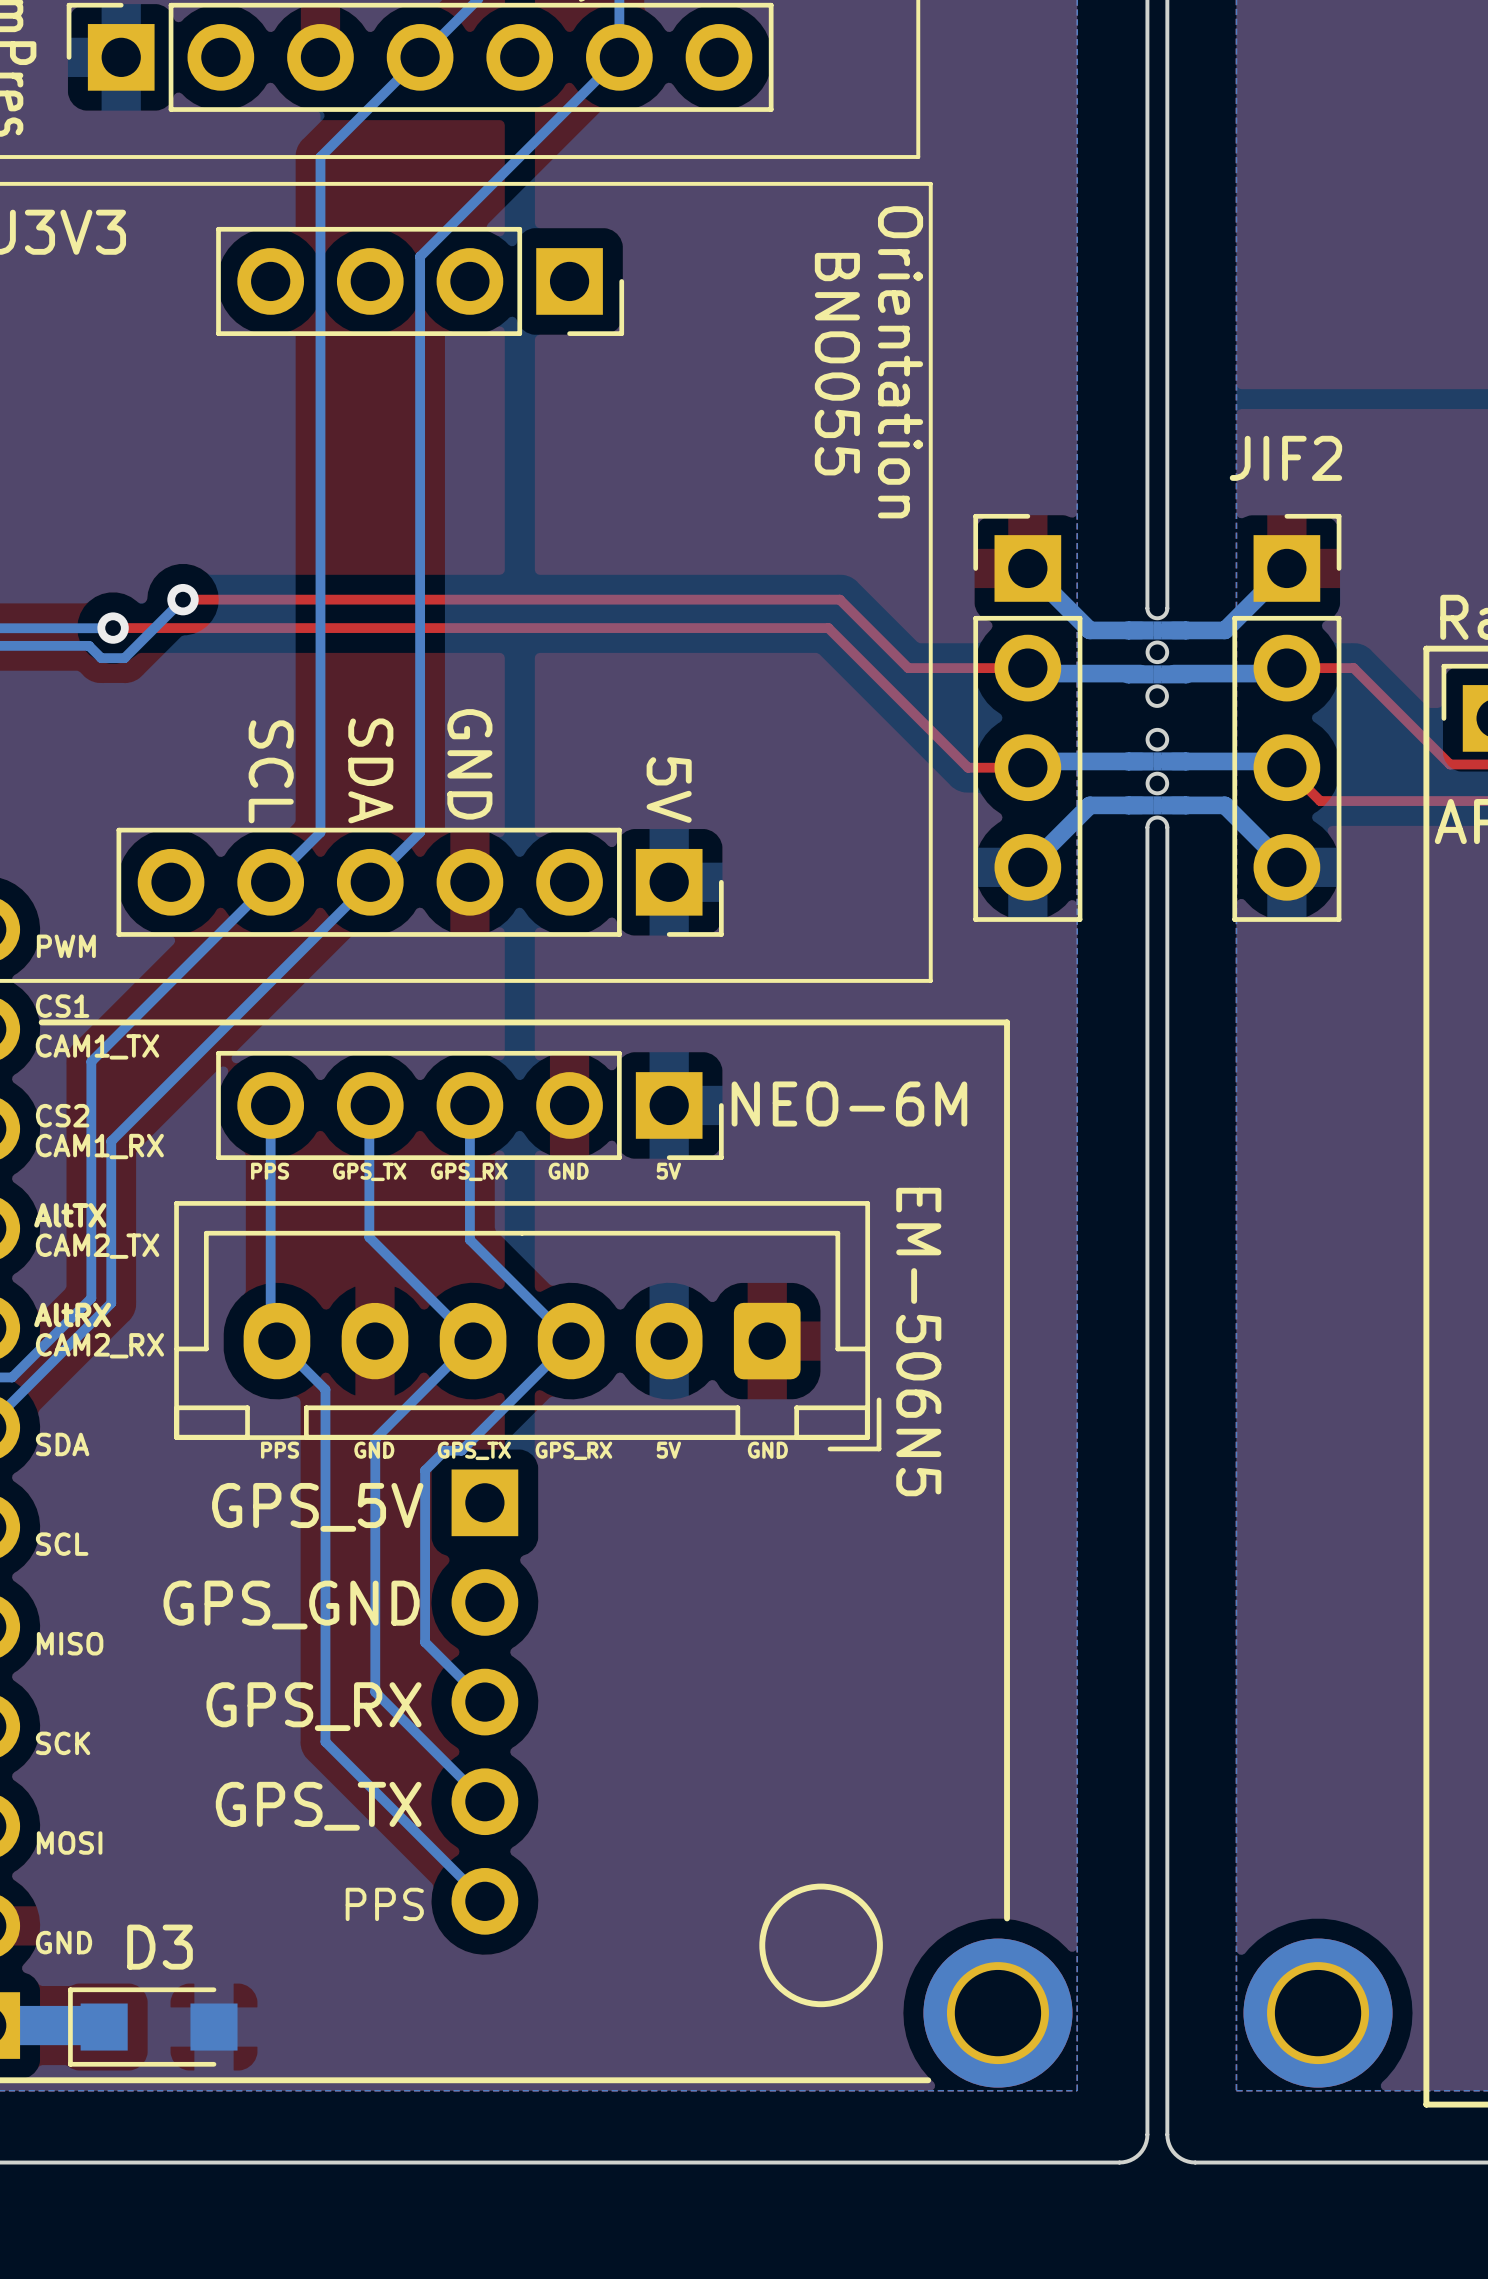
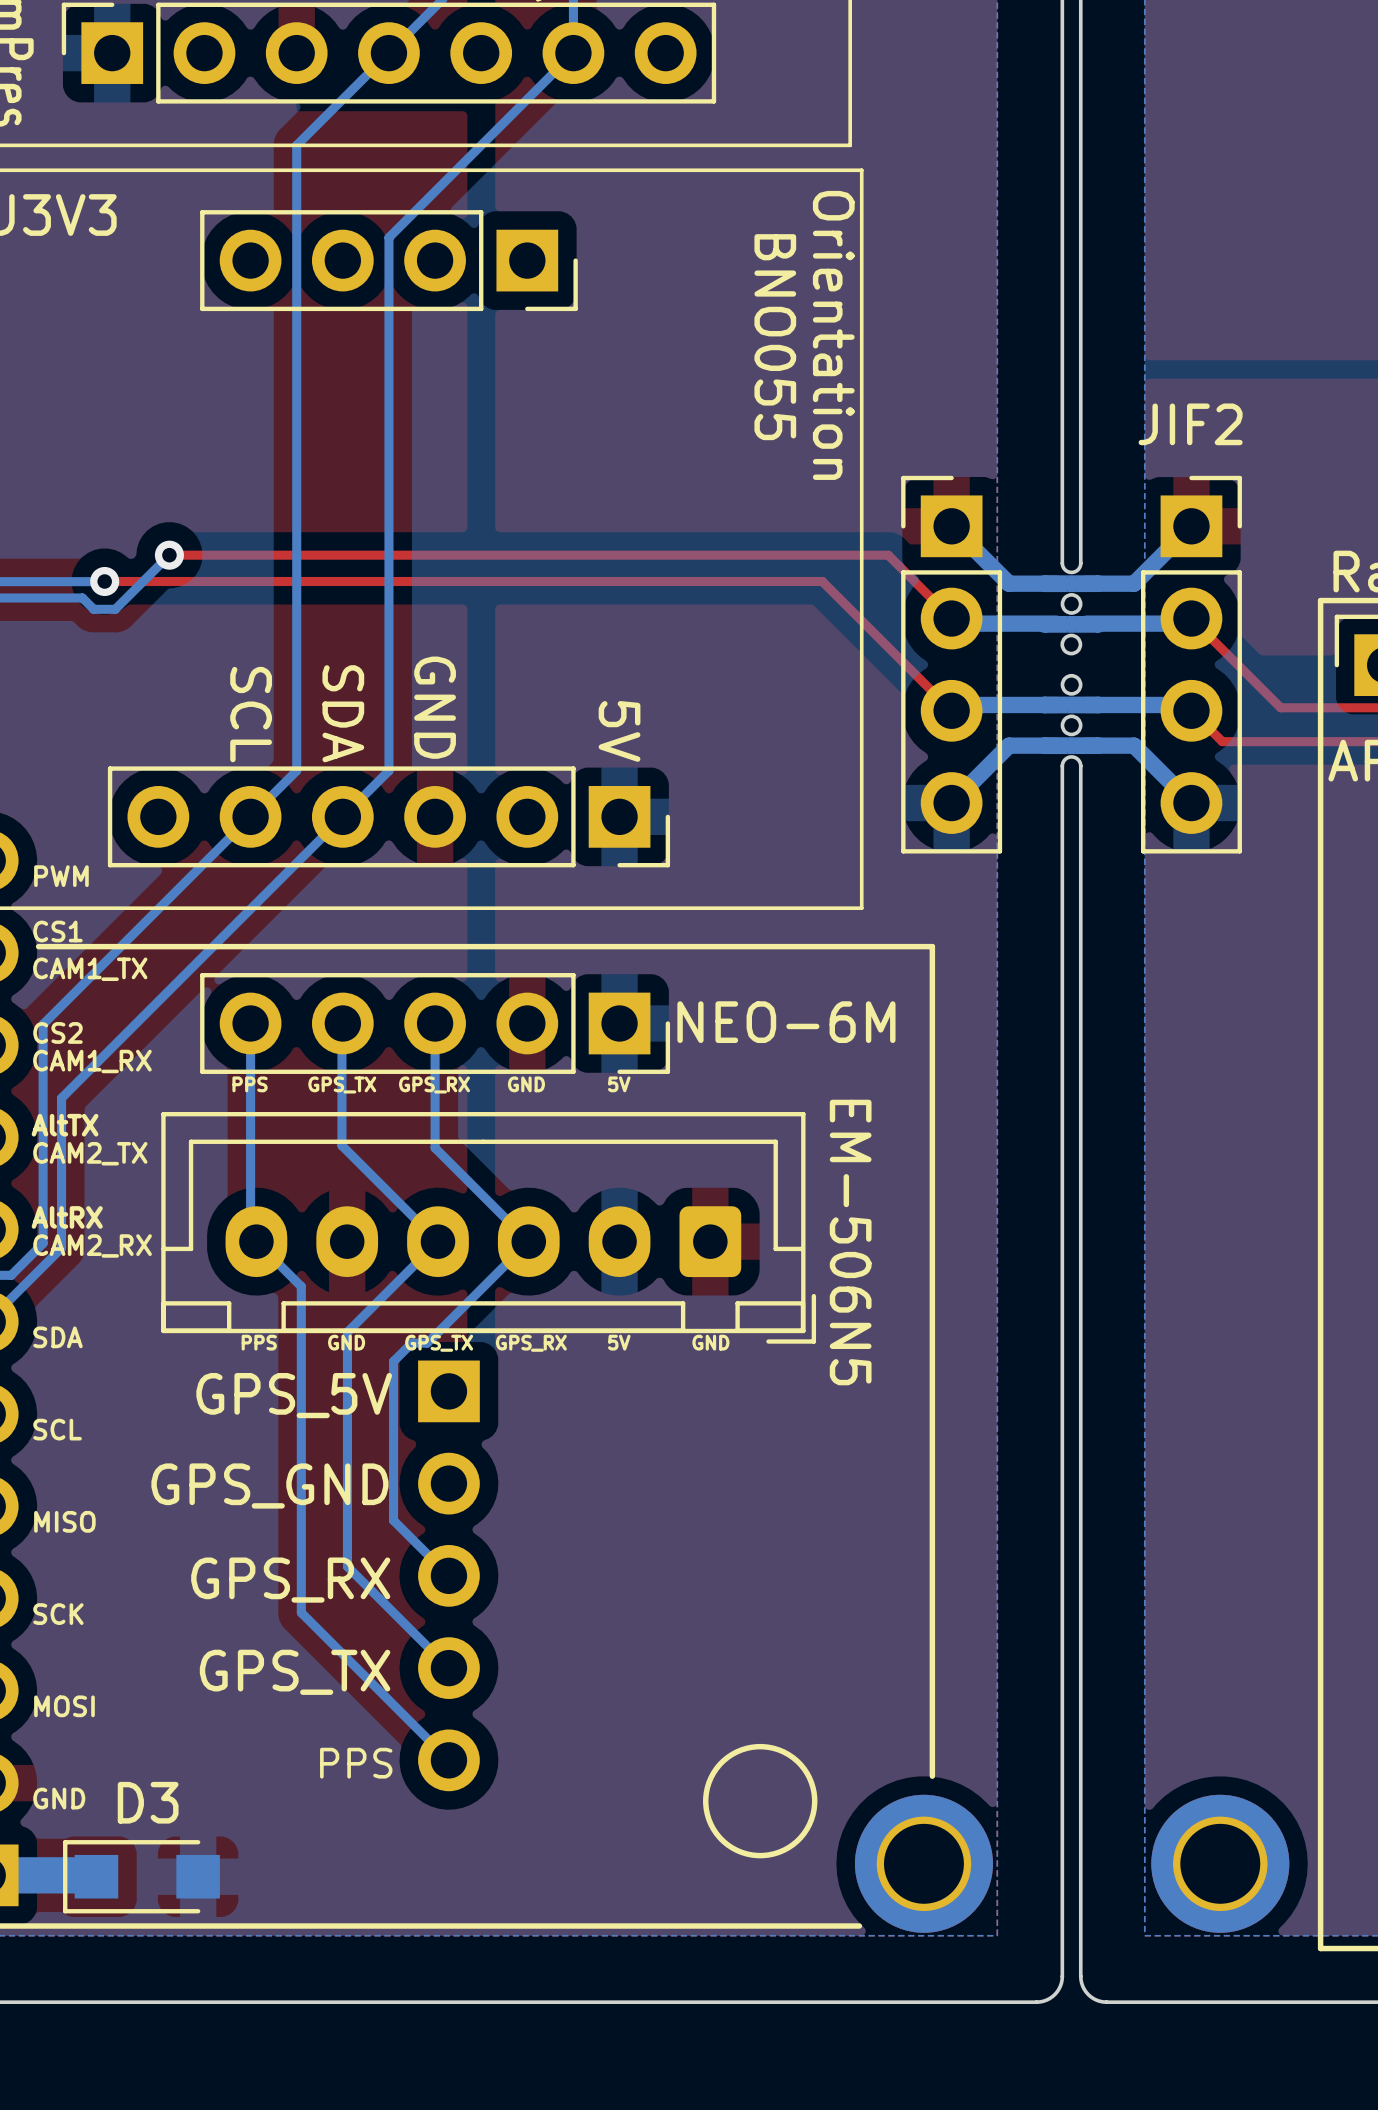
top track: (839, 599) (908, 668) (1027, 668) -> (777, 555) (888, 555) (951, 618)
top track: (828, 628) (968, 767) (1027, 767) -> (767, 581) (822, 581) (951, 710)
top track: (1286, 668) (1353, 668) (1450, 764) -> (1191, 618) (1280, 707) (1342, 707)
bottom track: (91, 1061) (91, 1298) (46, 1343) -> (84, 982) (43, 1024) (43, 1243)
bottom track: (111, 1141) (111, 1303) (66, 1348) -> (103, 1056) (61, 1098) (61, 1248)

